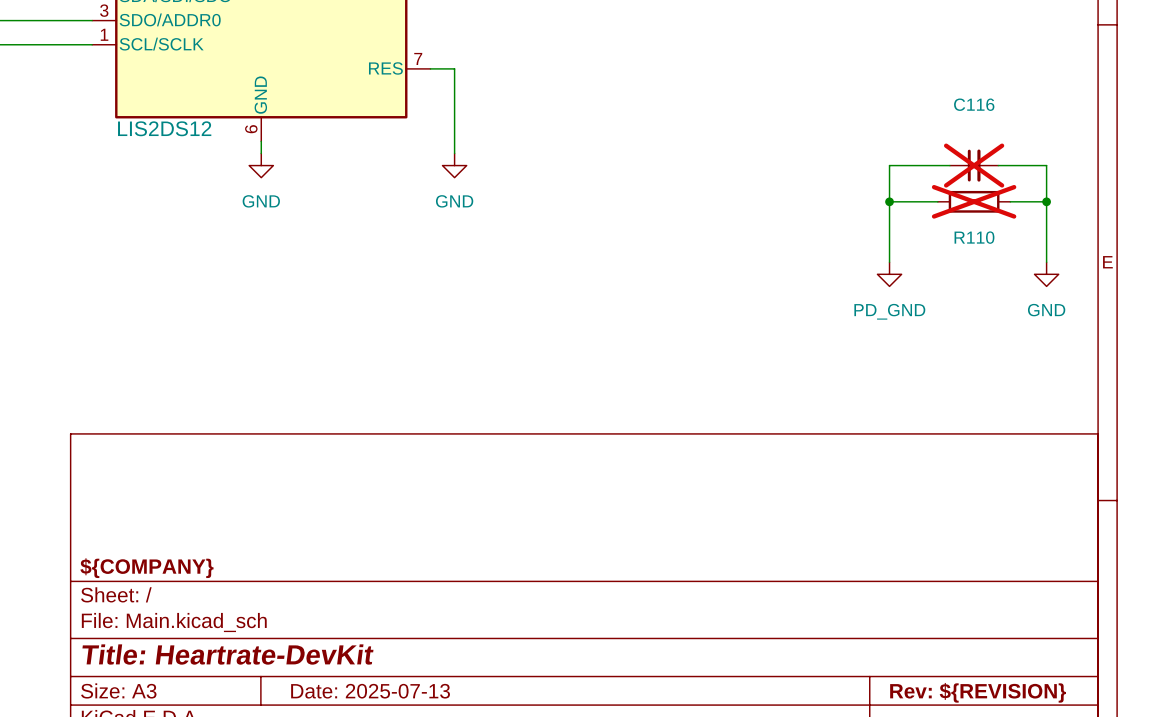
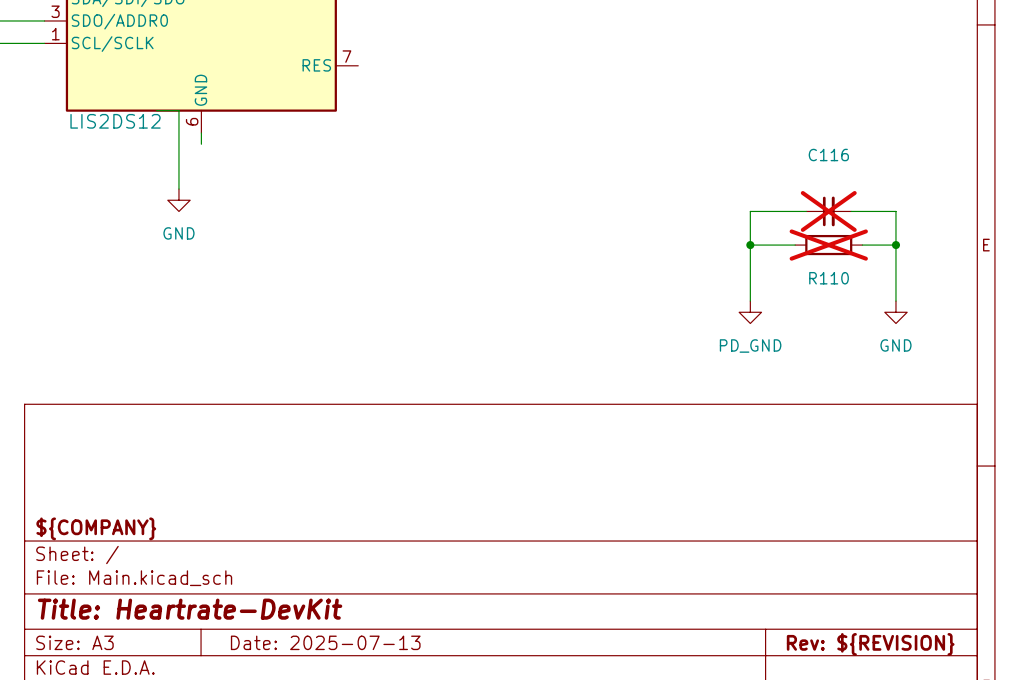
wire: (430, 68) (454, 68) (454, 153) -> (156, 110) (178, 110) (178, 189)
power symbol position: GND (261, 165) -> GND (178, 200)
power symbol: GND (454, 165) -> none
wire: (949, 165) (889, 165) (889, 262) -> (806, 211) (750, 211) (750, 301)
C116 position: (974, 165) -> (828, 211)
wire: (998, 165) (1046, 165) (1046, 262) -> (851, 211) (895, 211) (895, 301)
wire: (889, 201) (937, 201) -> (750, 245) (795, 245)
junction: (889, 201) -> none
R110 position: (974, 201) -> (828, 245)
wire: (1010, 201) (1046, 201) -> (862, 245) (895, 245)
junction: (1046, 201) -> none
junction: none -> (750, 245)
junction: none -> (895, 245)
power symbol position: PD_GND (889, 274) -> PD_GND (750, 312)
power symbol position: GND (1046, 274) -> GND (895, 312)

